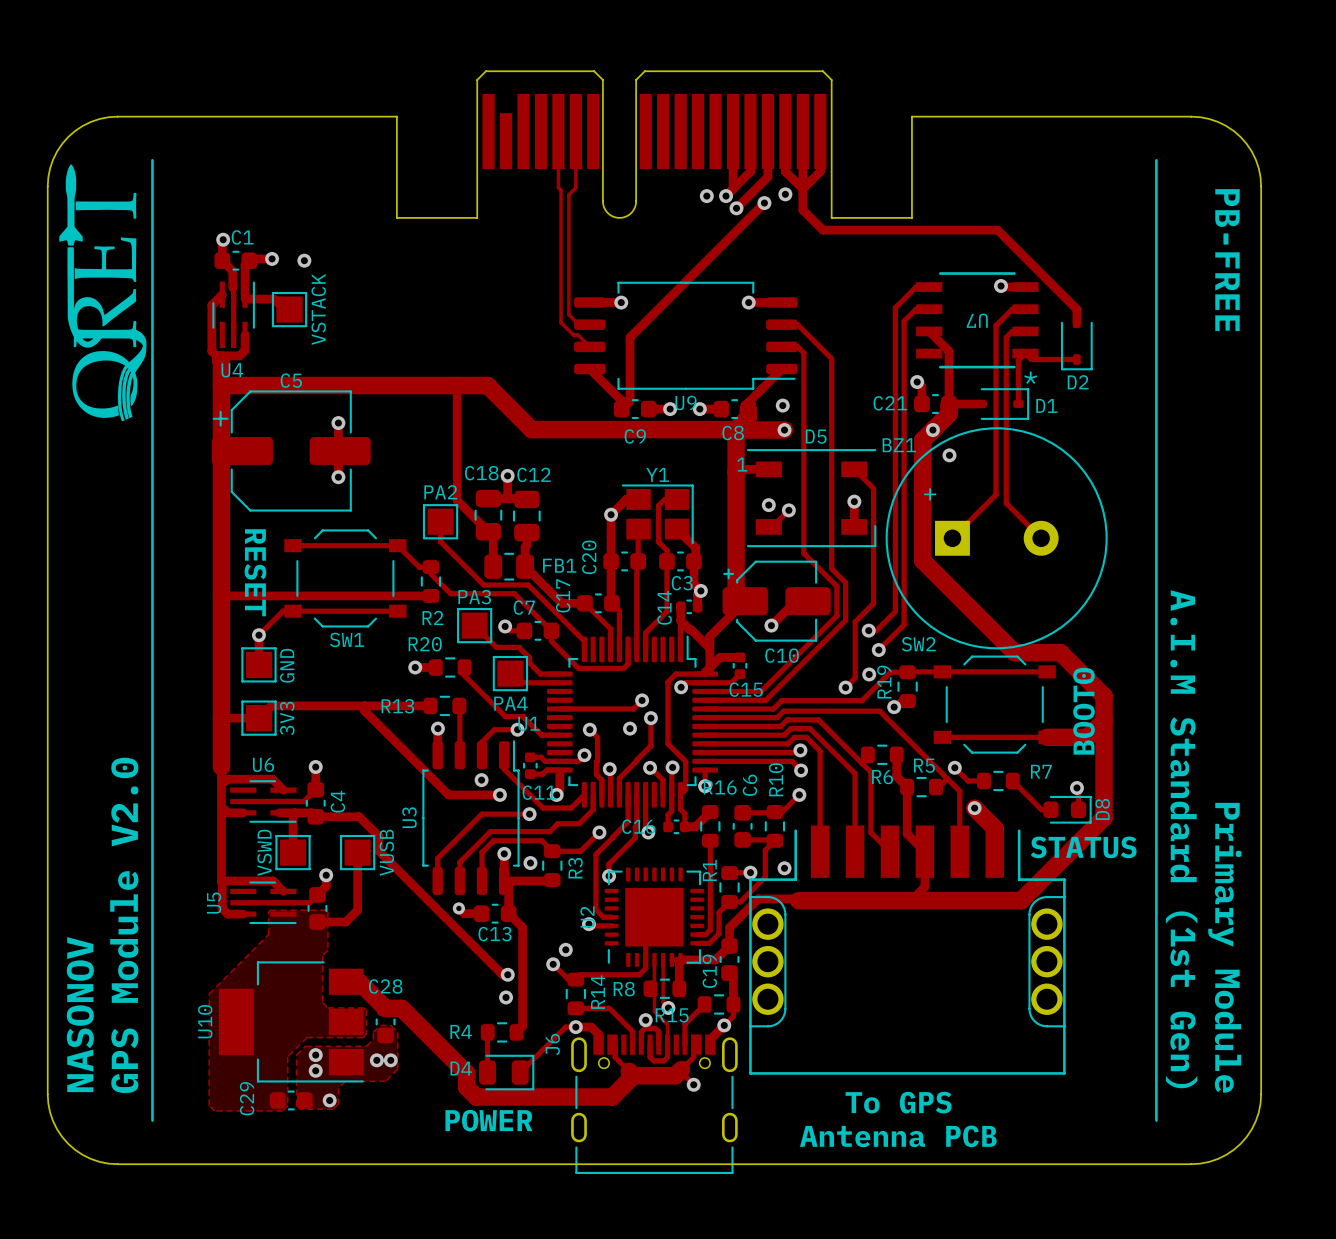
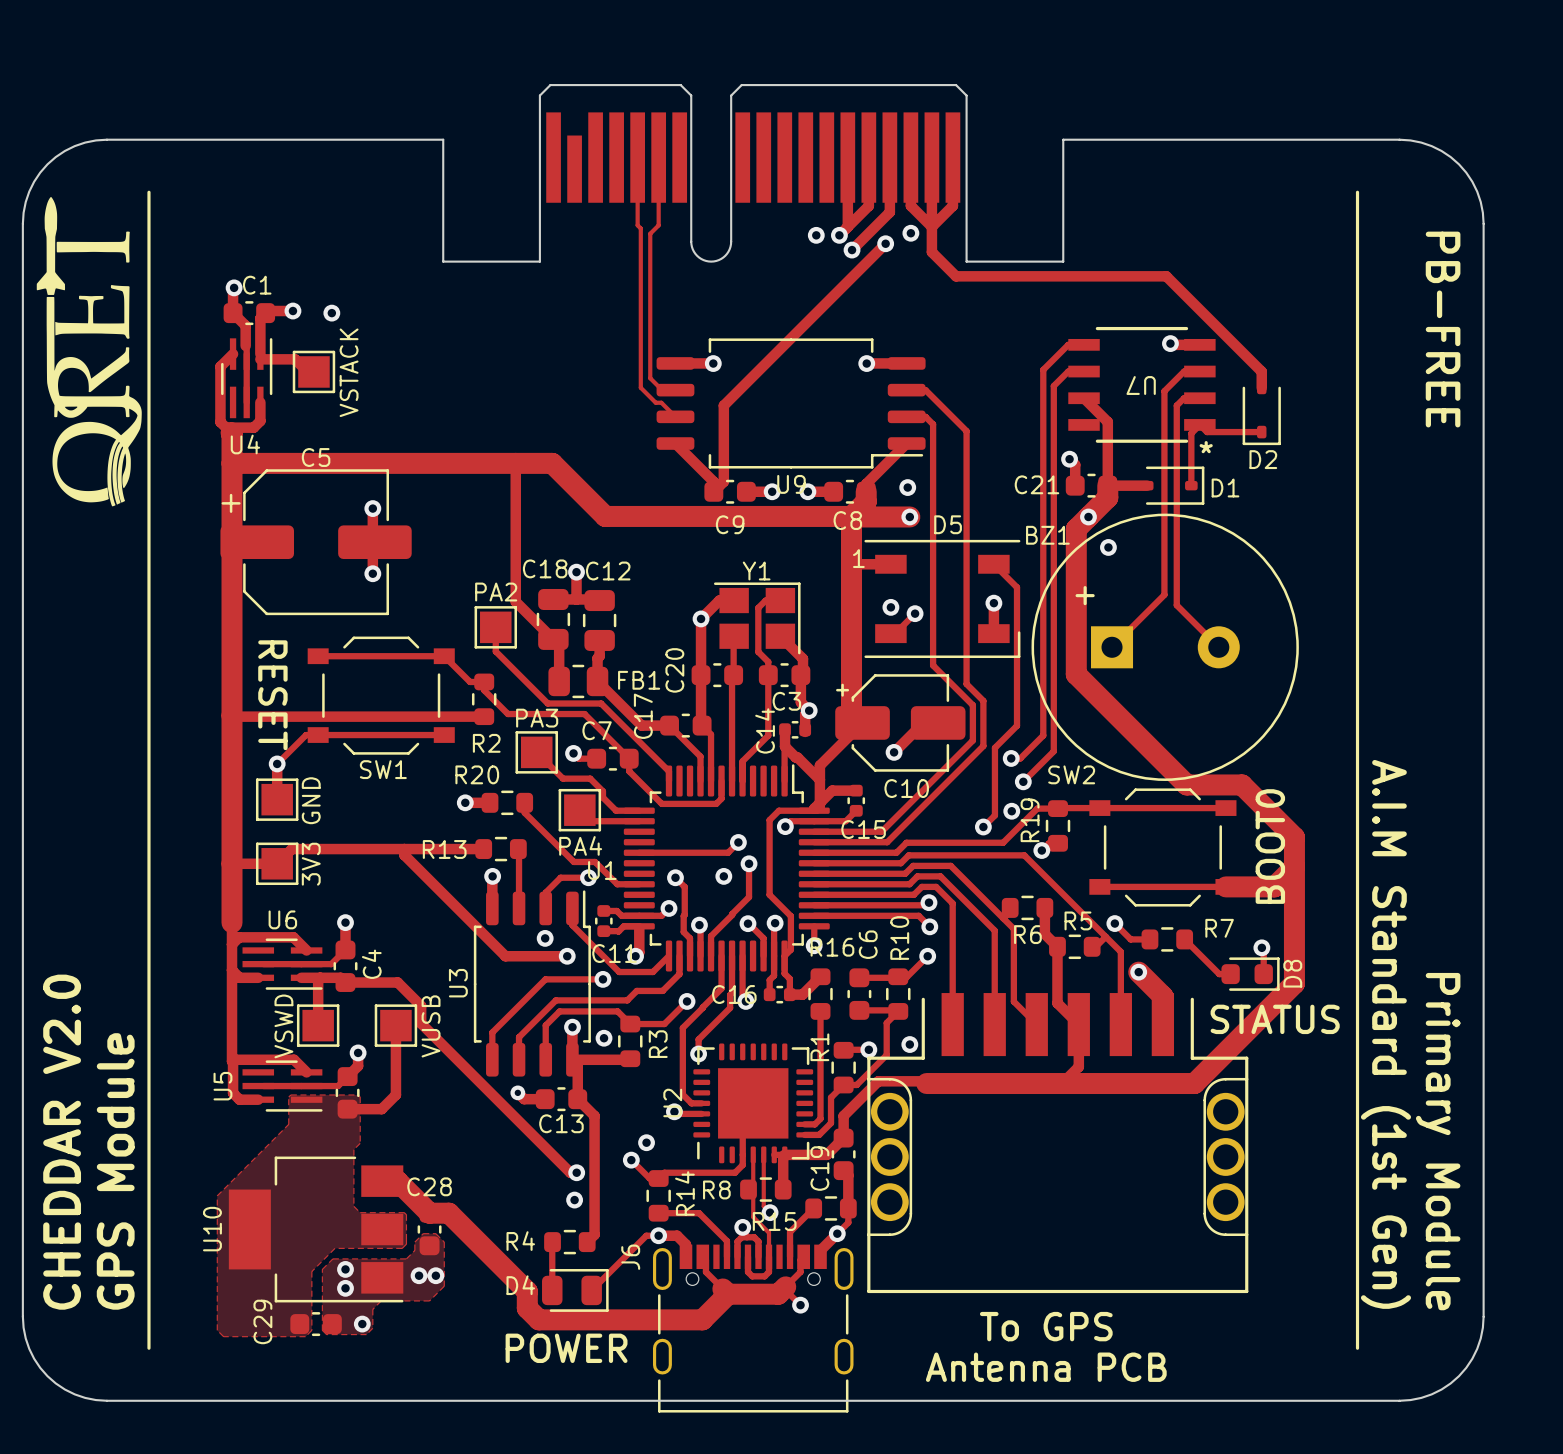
text: GPS Module V2.0 (124, 925) -> GPS Module (115, 1171)
text: NASONOV (80, 1014) -> CHEDDAR V2.0 (62, 1142)

